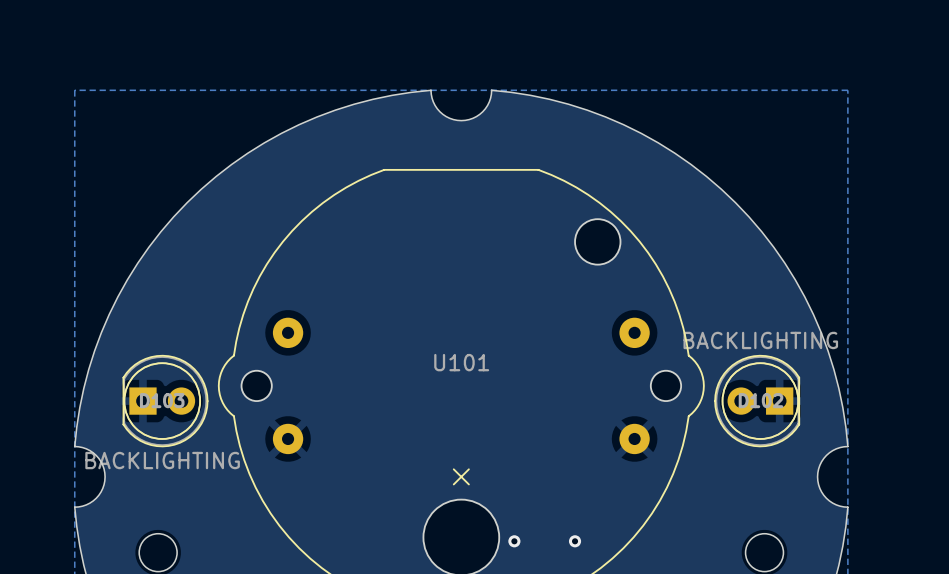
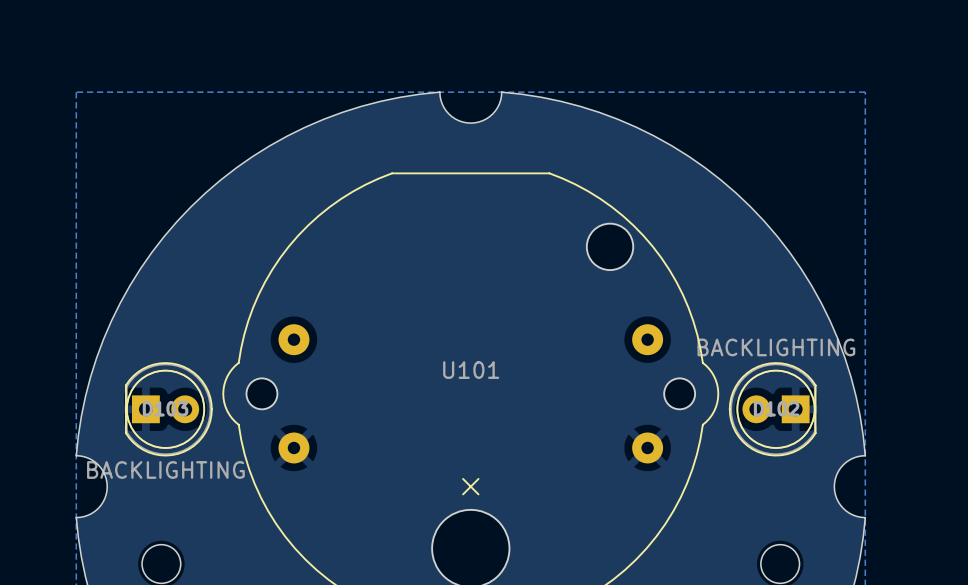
via: (514, 541) -> none
via: (575, 541) -> none

